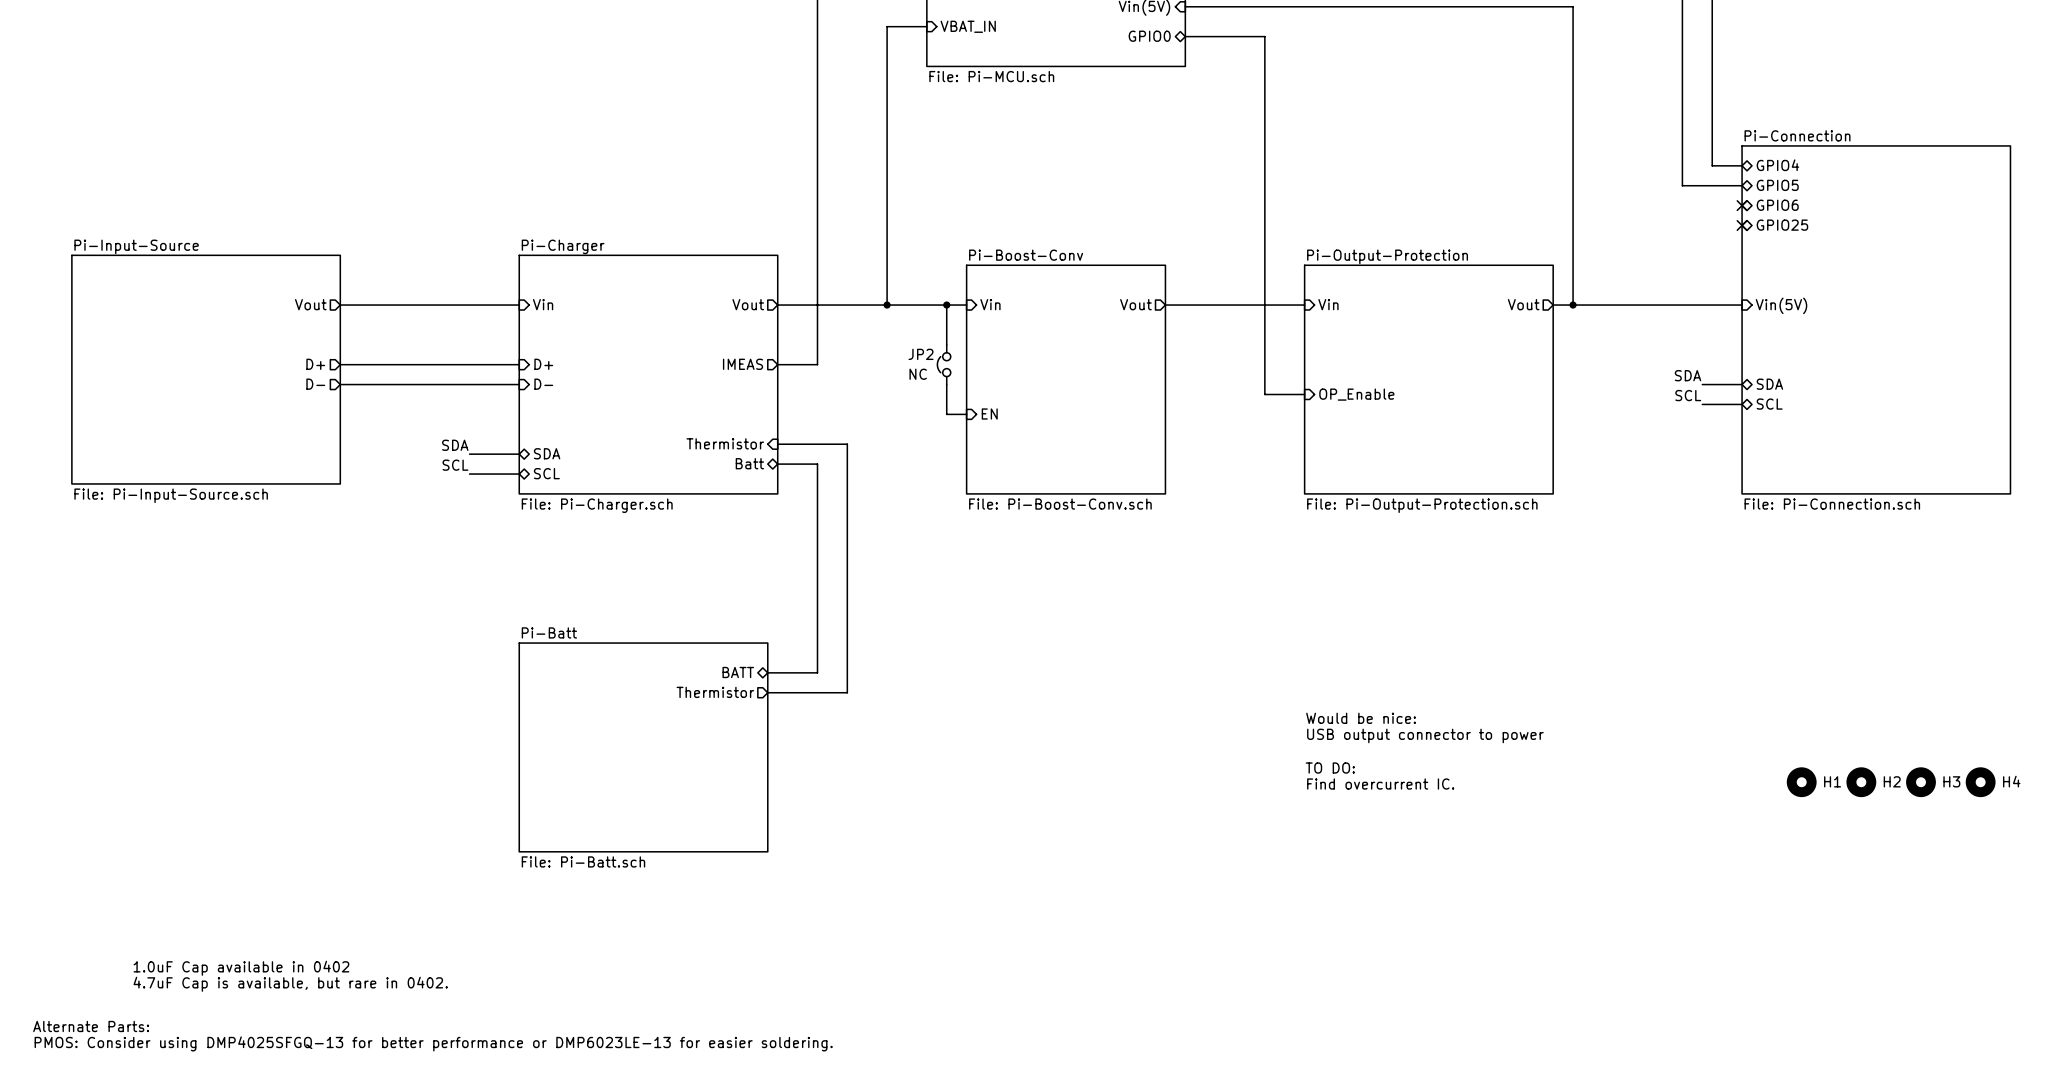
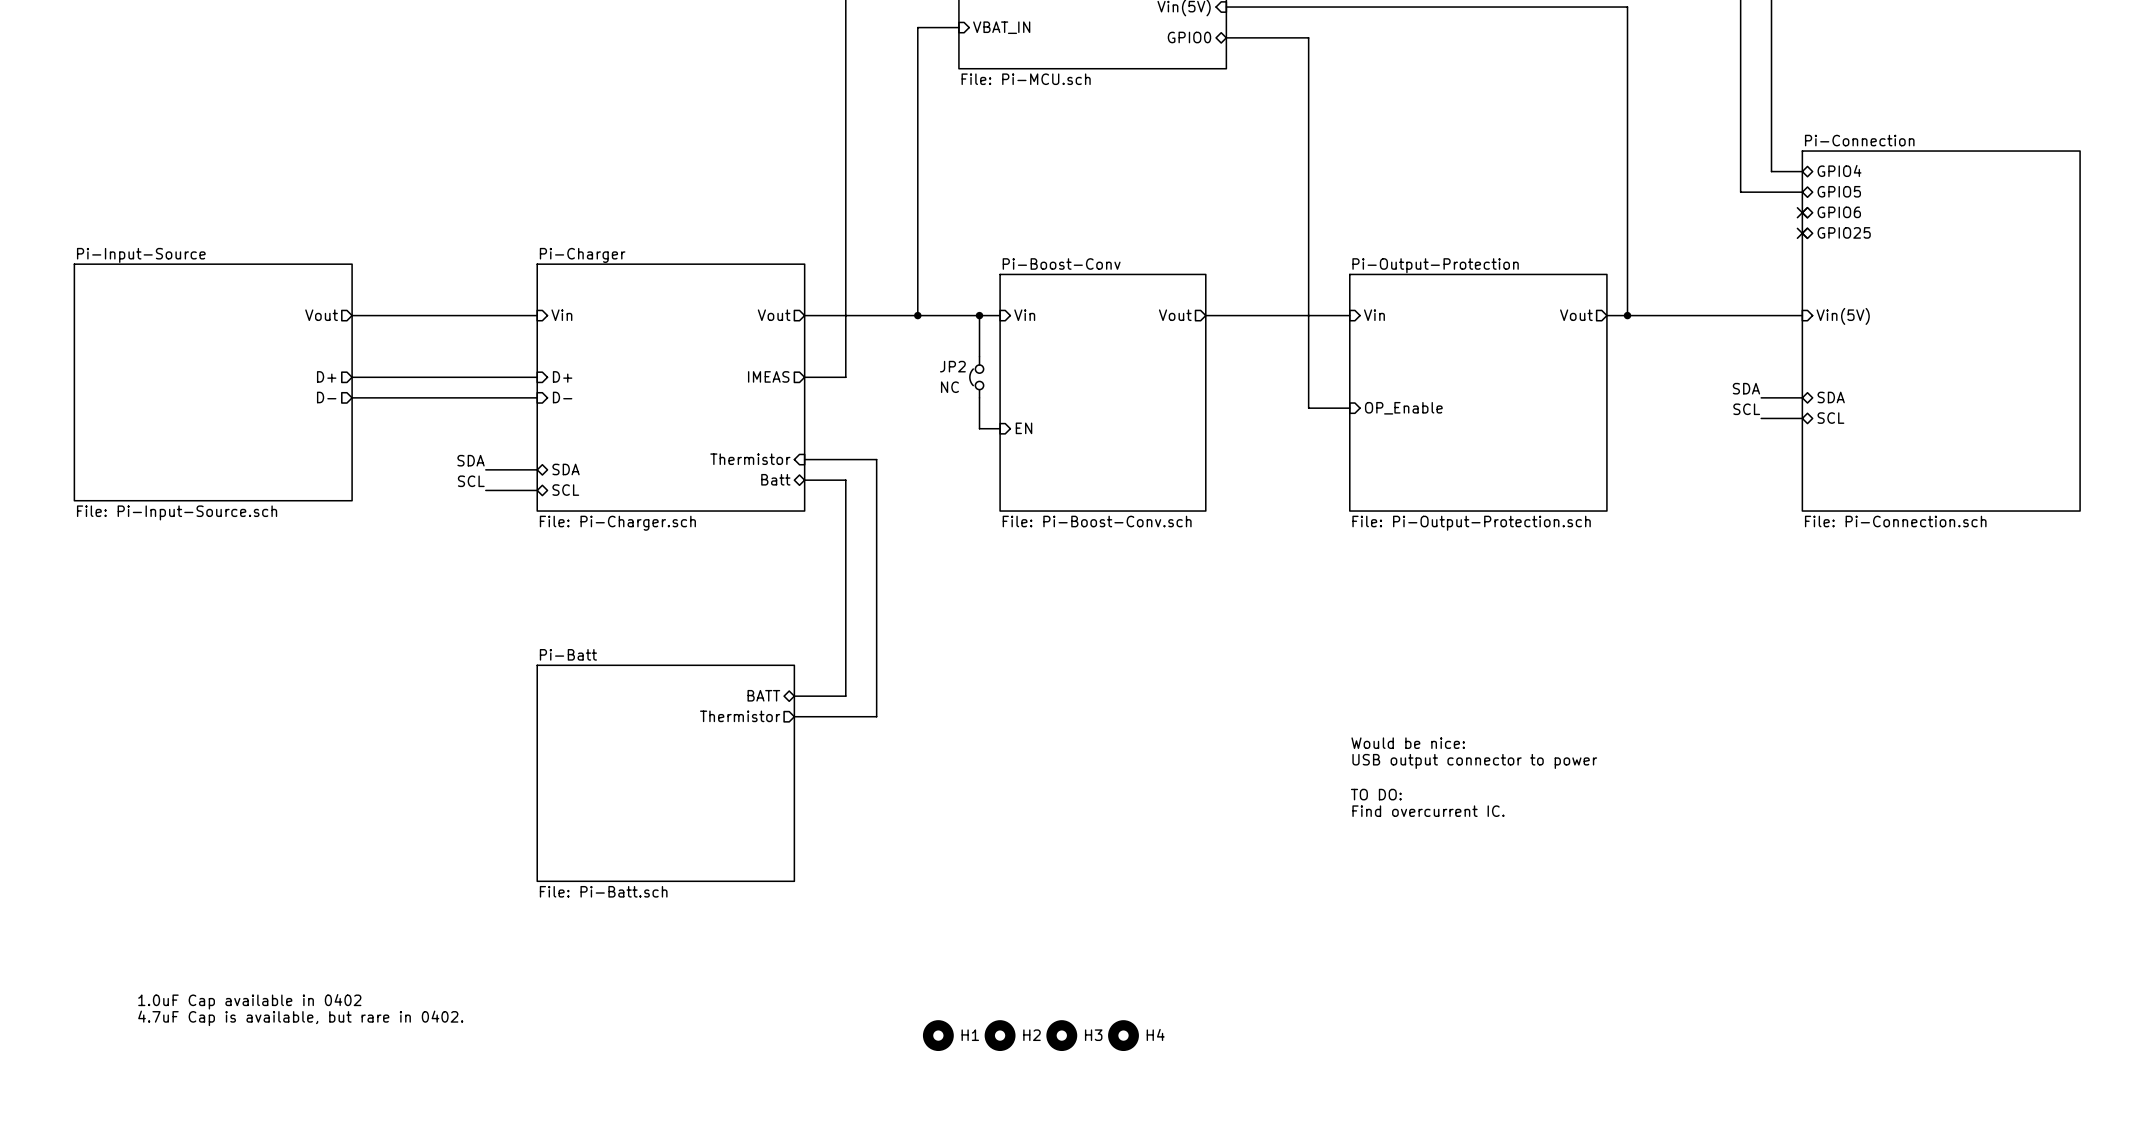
H1 position: (1801, 782) -> (938, 1035)
H2 position: (1861, 782) -> (1000, 1035)
H3 position: (1921, 782) -> (1061, 1035)
H4 position: (1980, 782) -> (1123, 1035)
text: Alternate Parts: (91, 1026) -> none
text: PMOS: Consider using DMP4025SFGQ-13 for better performance or DMP6023LE-13 for easier soldering. (433, 1043) -> none

